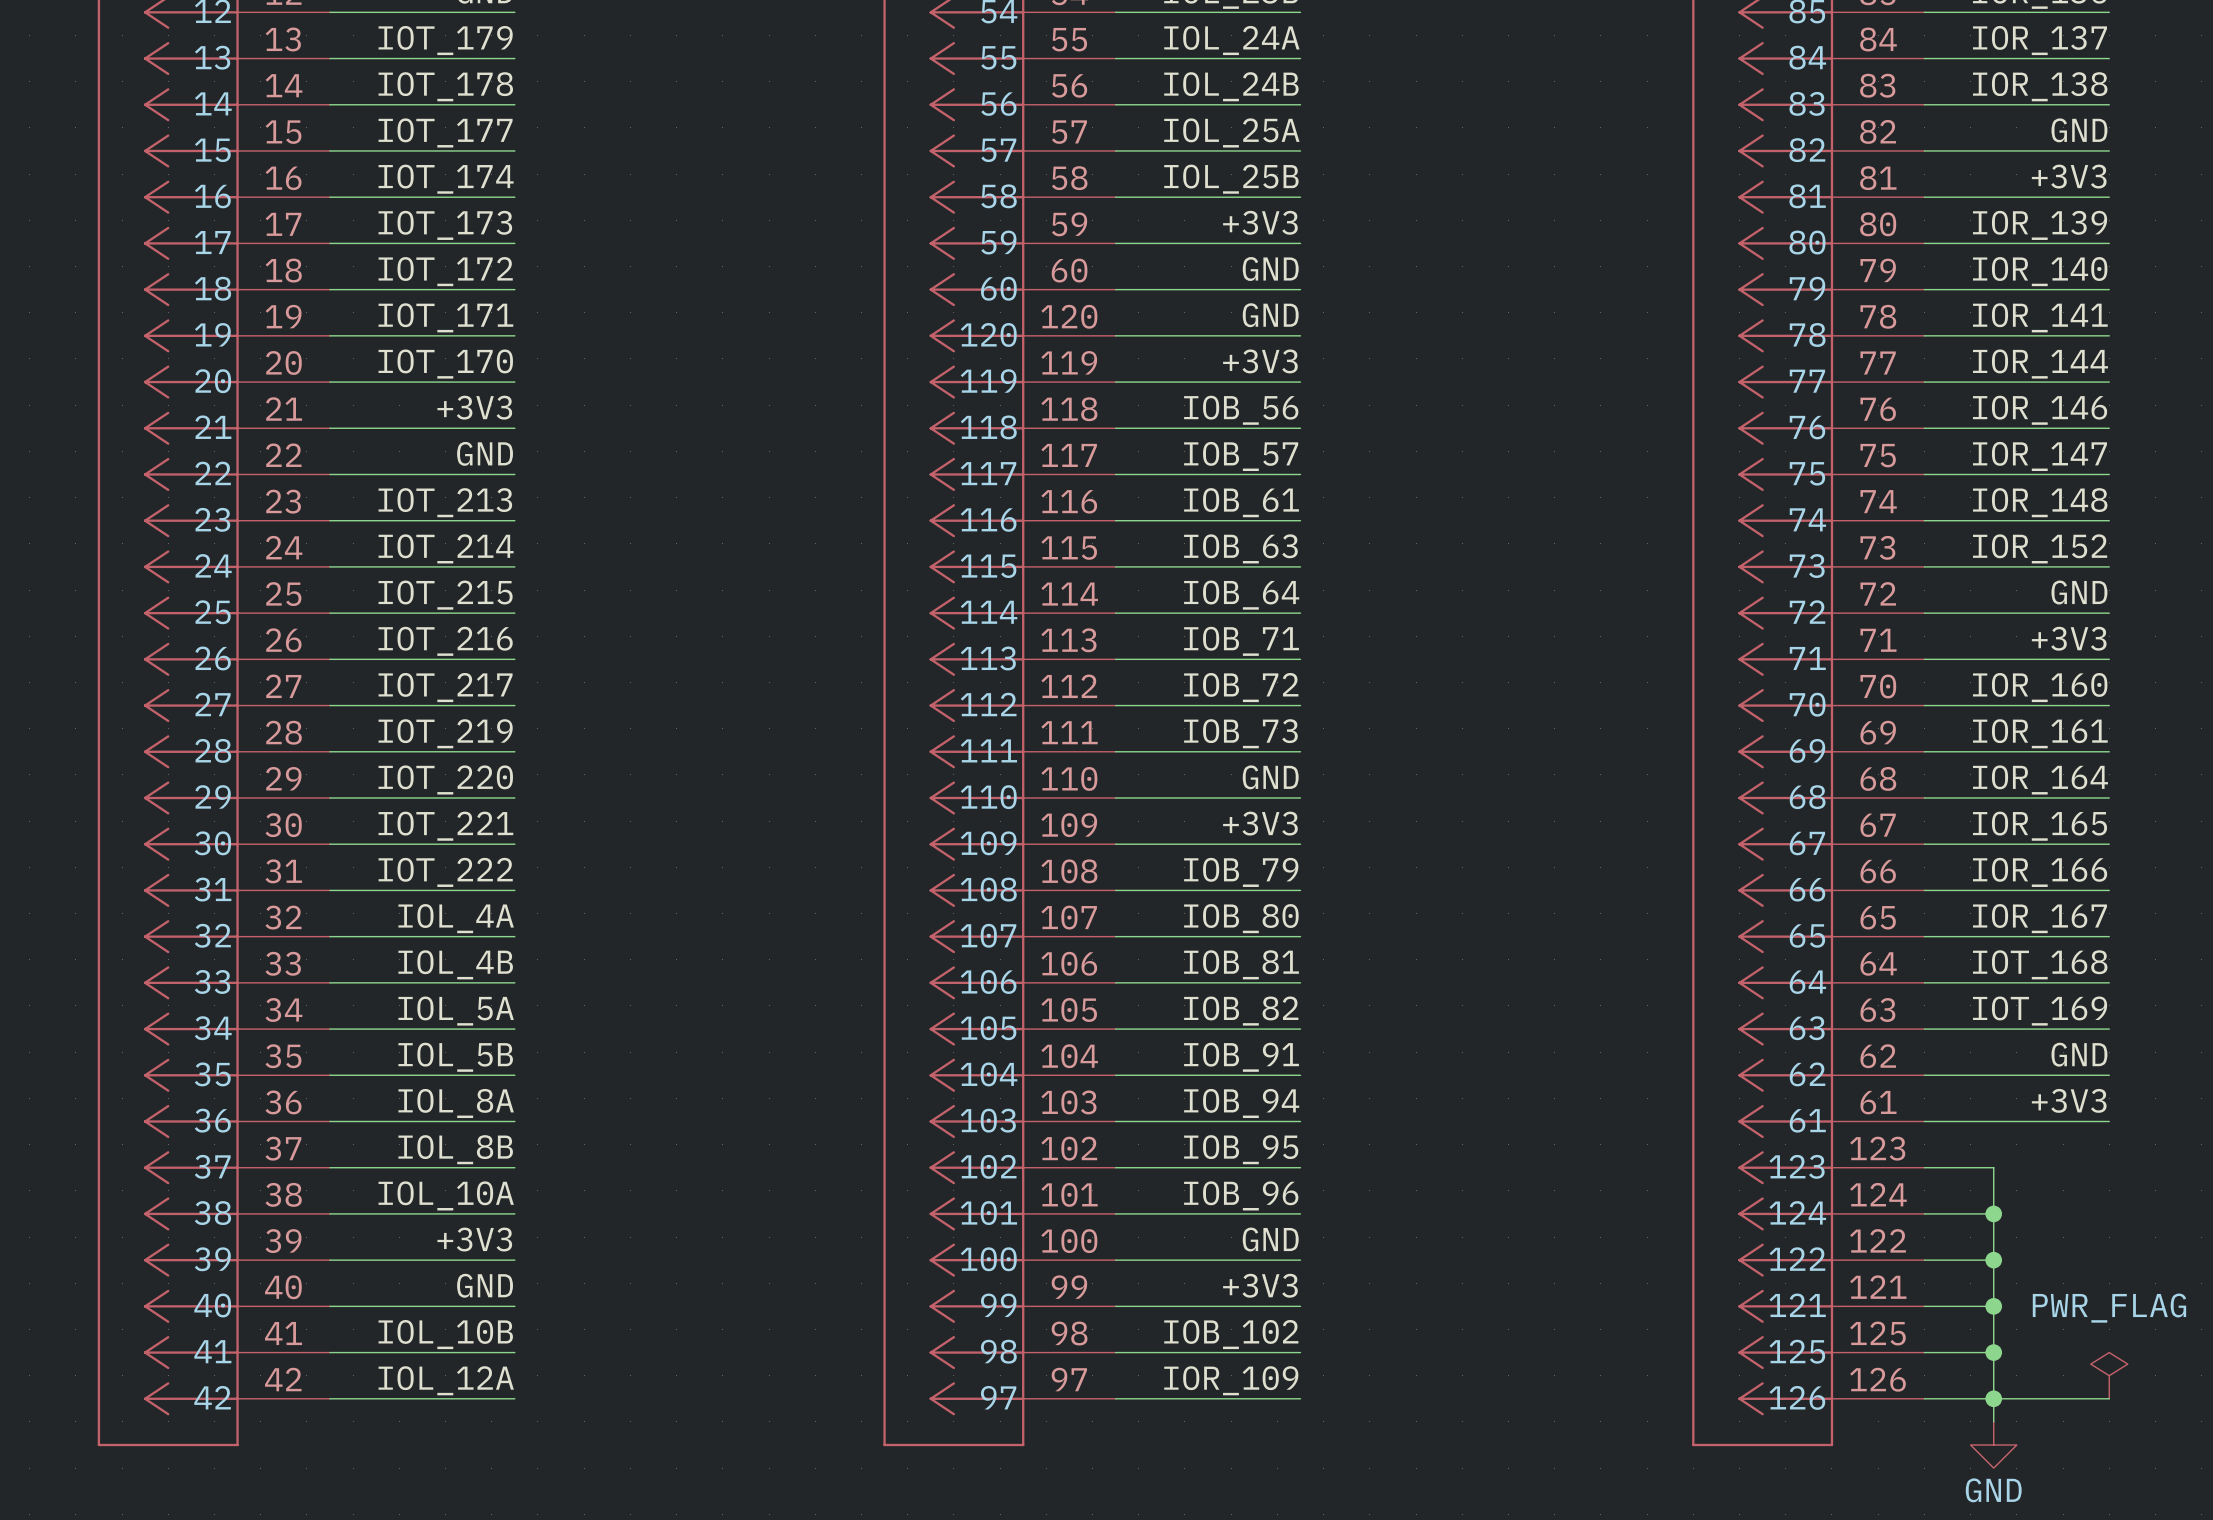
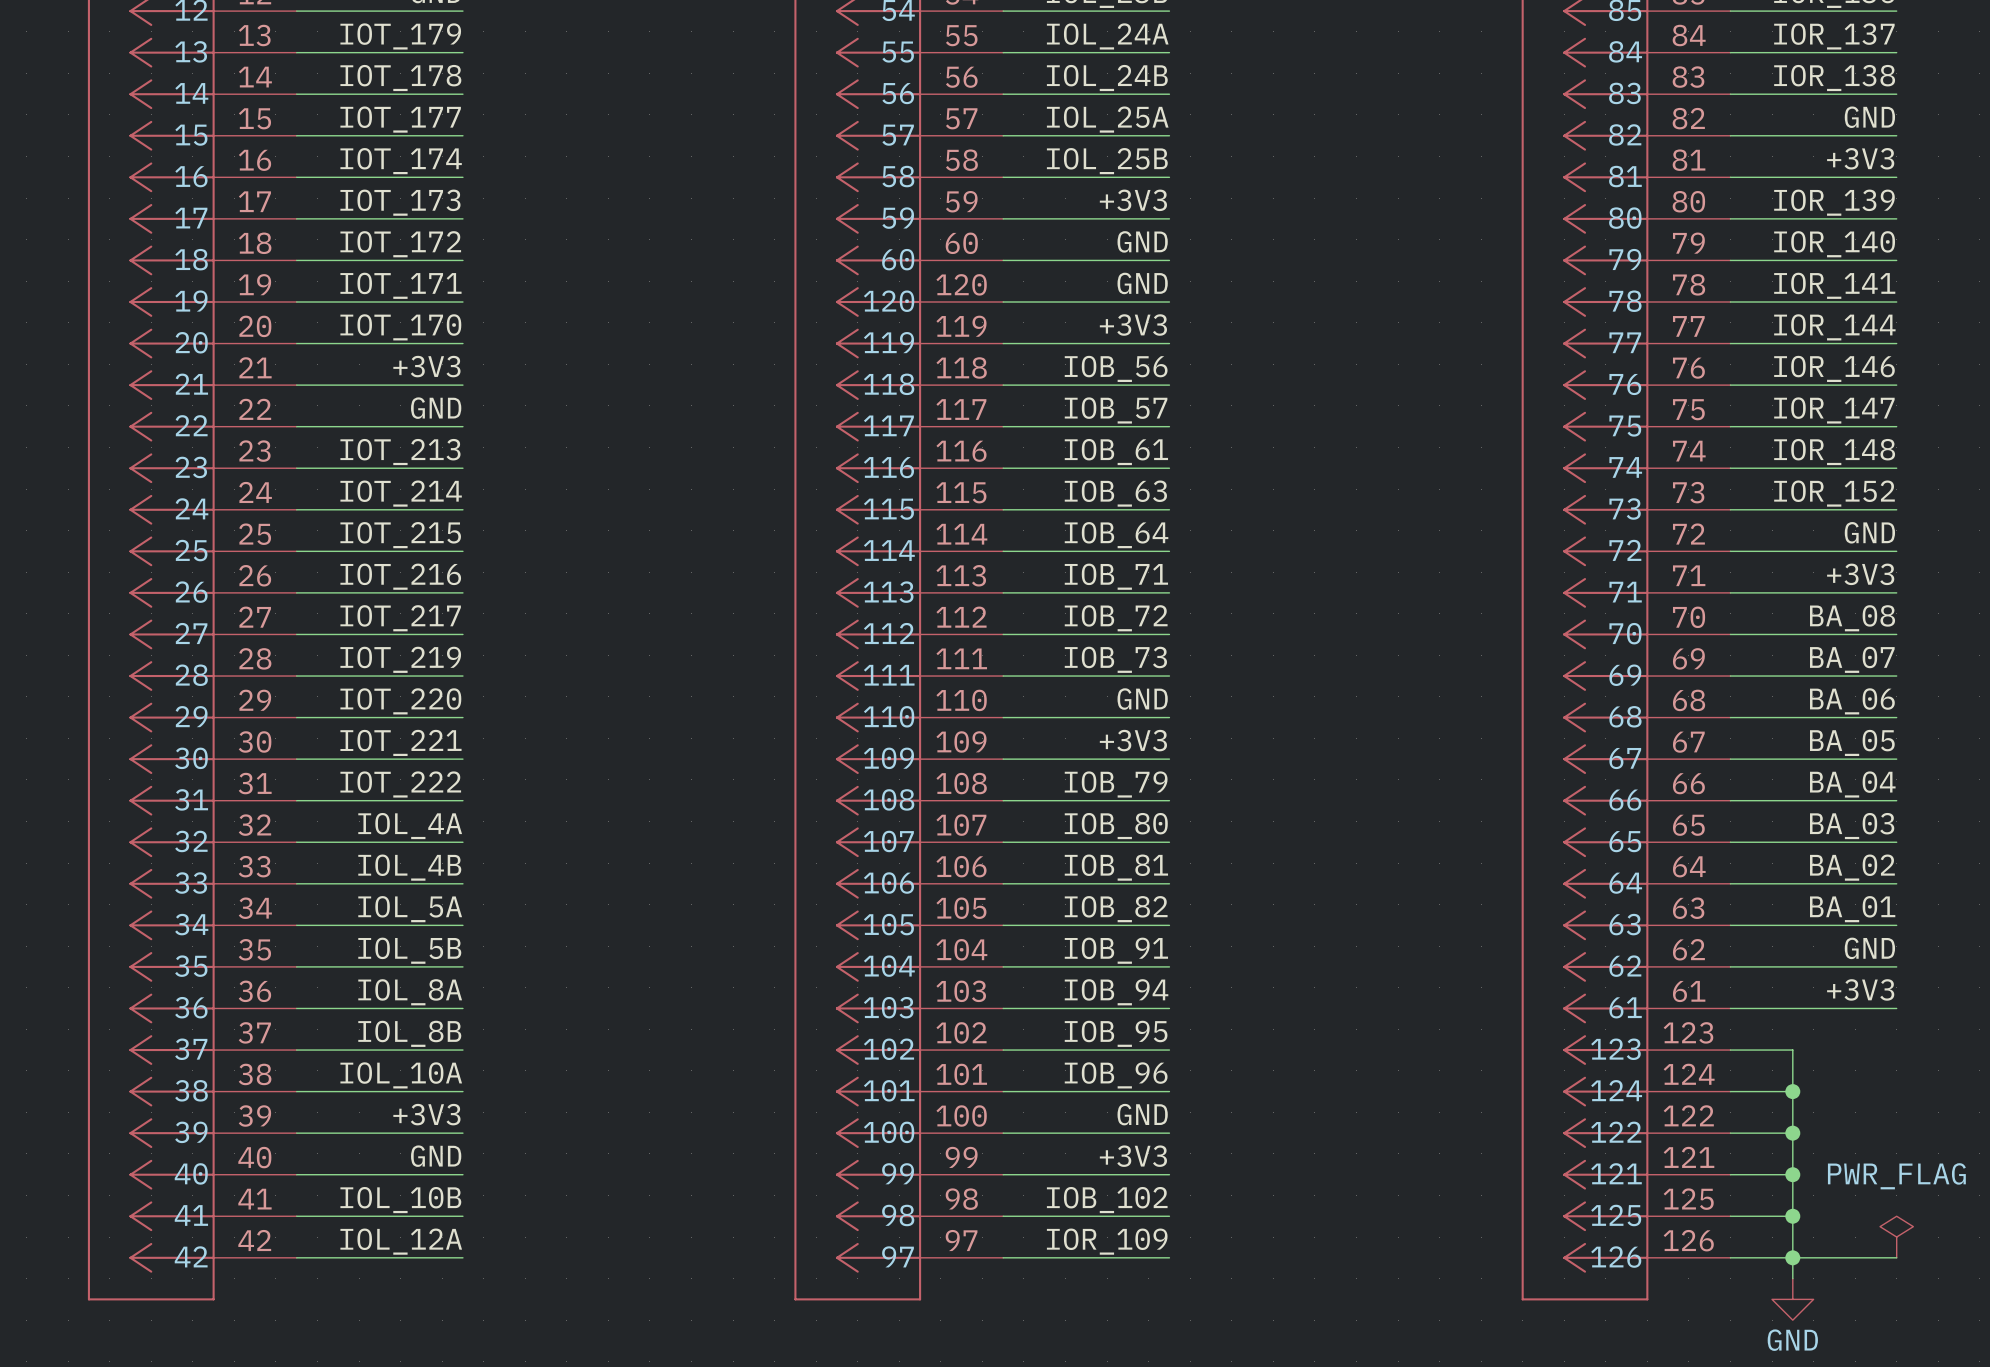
label: IOR_160 (2040, 687) -> BA_08 (1852, 618)
label: IOR_161 (2040, 733) -> BA_07 (1852, 659)
label: IOR_164 (2040, 779) -> BA_06 (1852, 701)
label: IOR_165 (2040, 826) -> BA_05 (1852, 742)
label: IOR_166 (2040, 872) -> BA_04 (1852, 784)
label: IOR_167 (2039, 918) -> BA_03 (1852, 826)
label: IOT_168 (2040, 964) -> BA_02 (1852, 867)
label: IOT_169 (2040, 1011) -> BA_01 (1852, 909)

